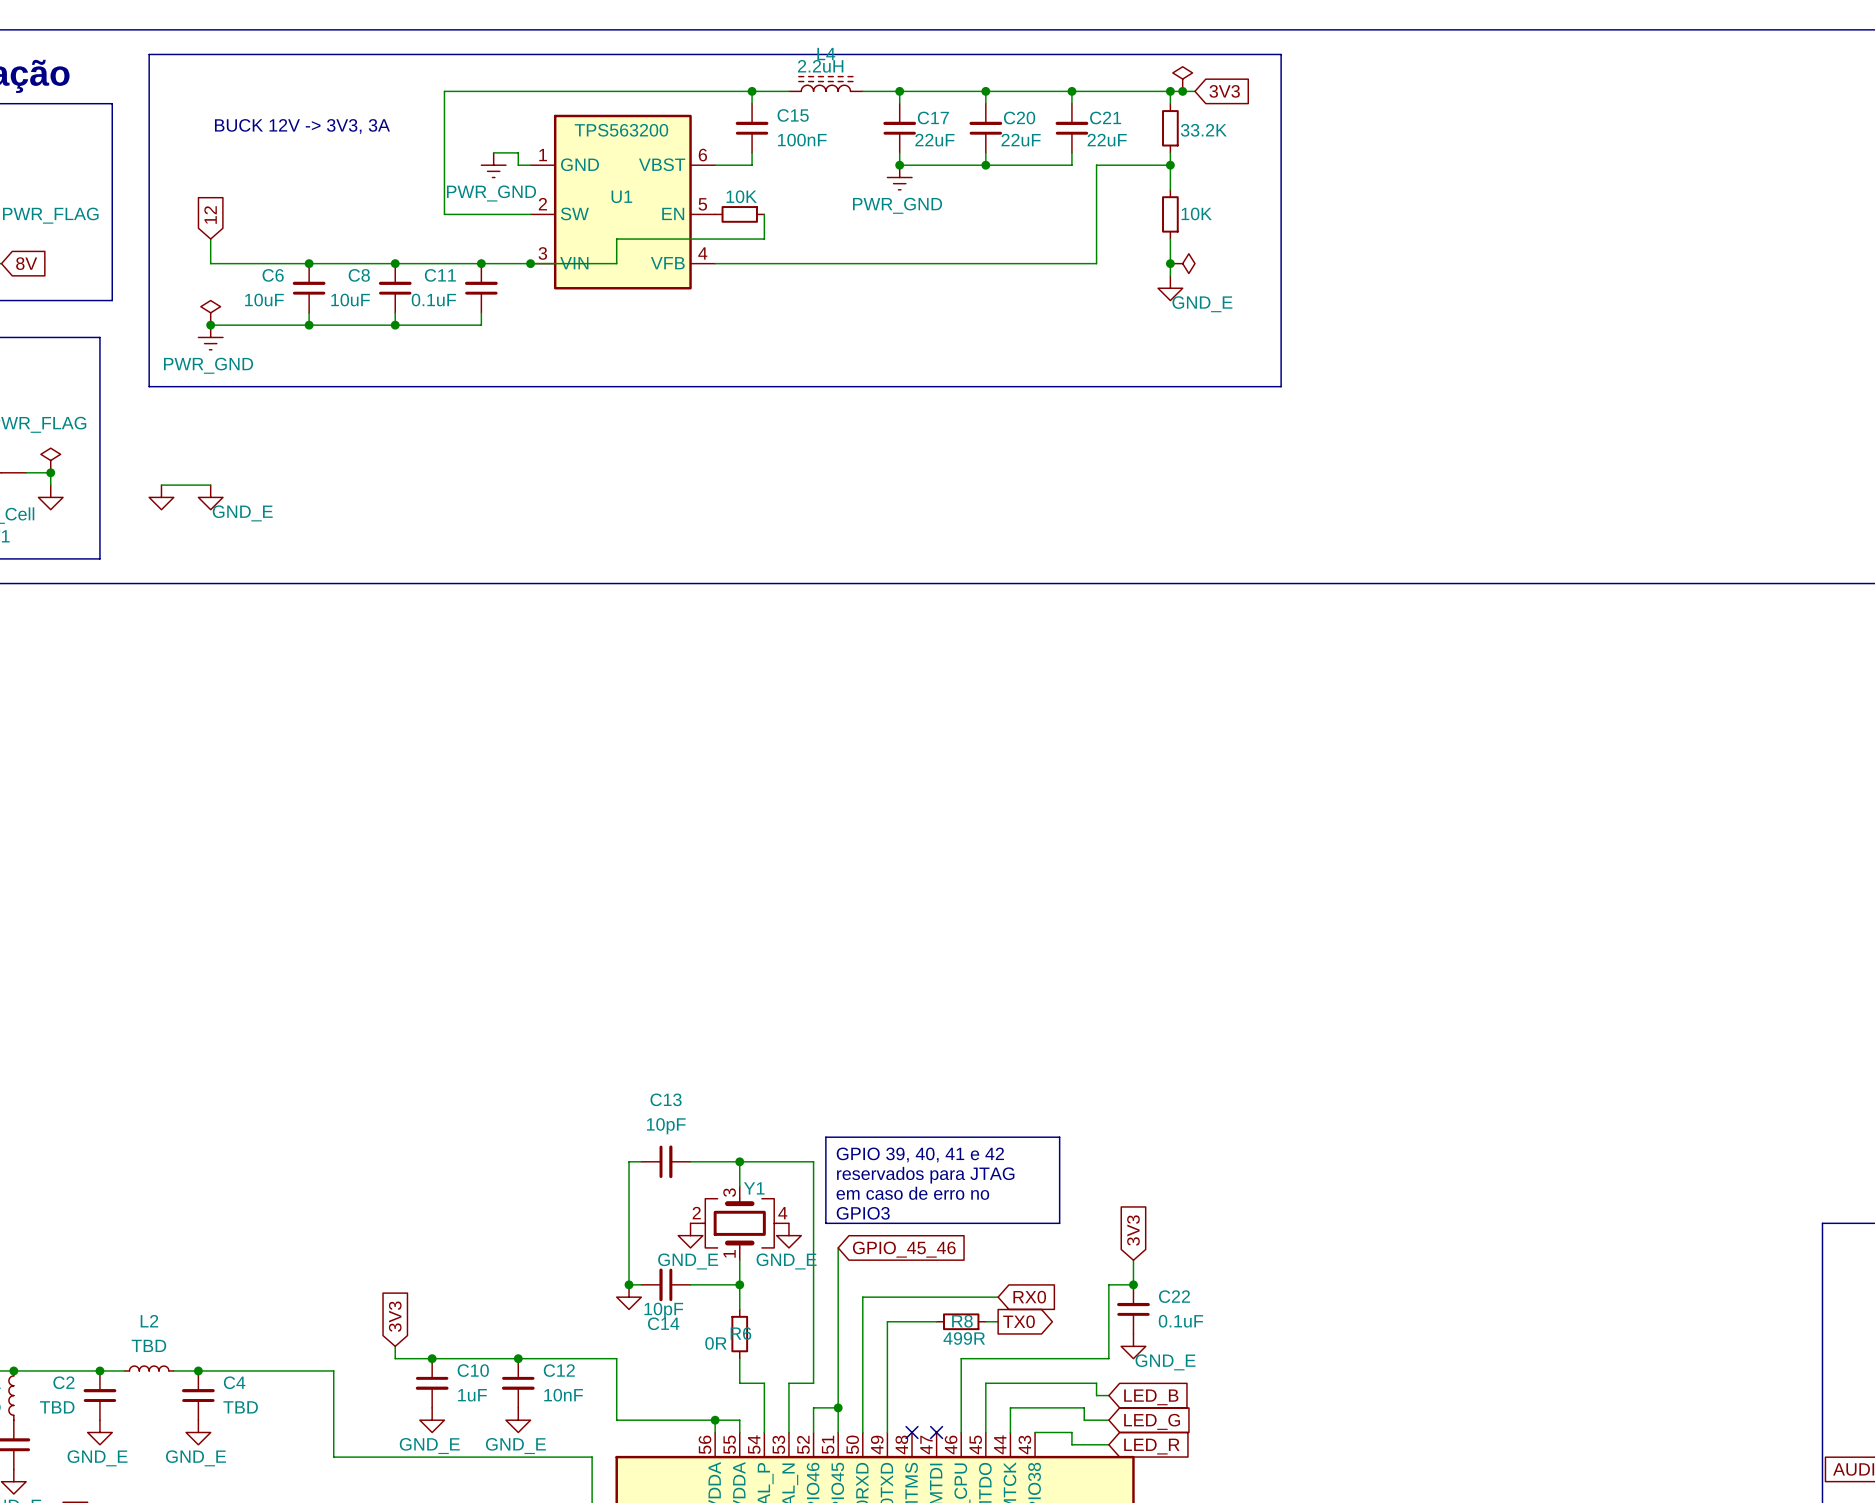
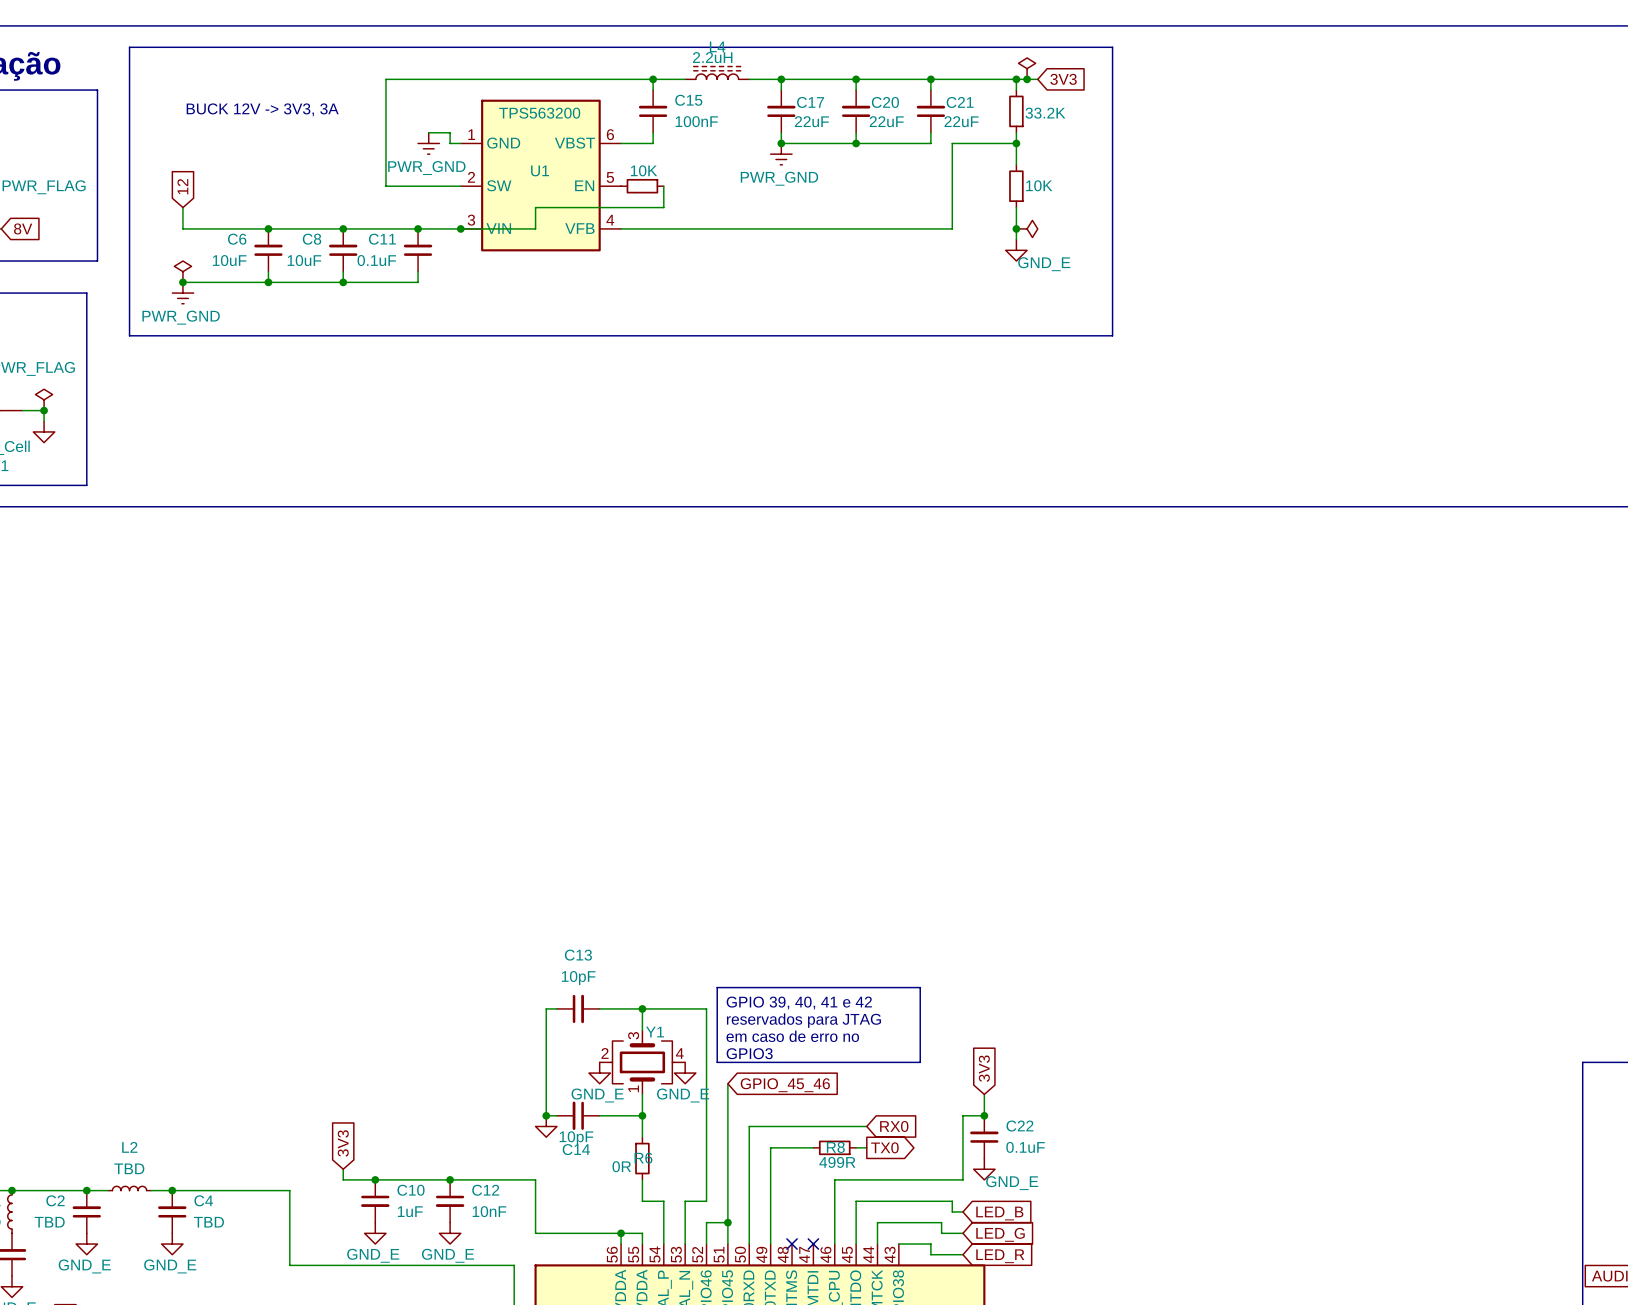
wire: (161, 485) (210, 485) -> none
power symbol: (161, 497) -> none
power symbol: GND_E (210, 497) -> none

